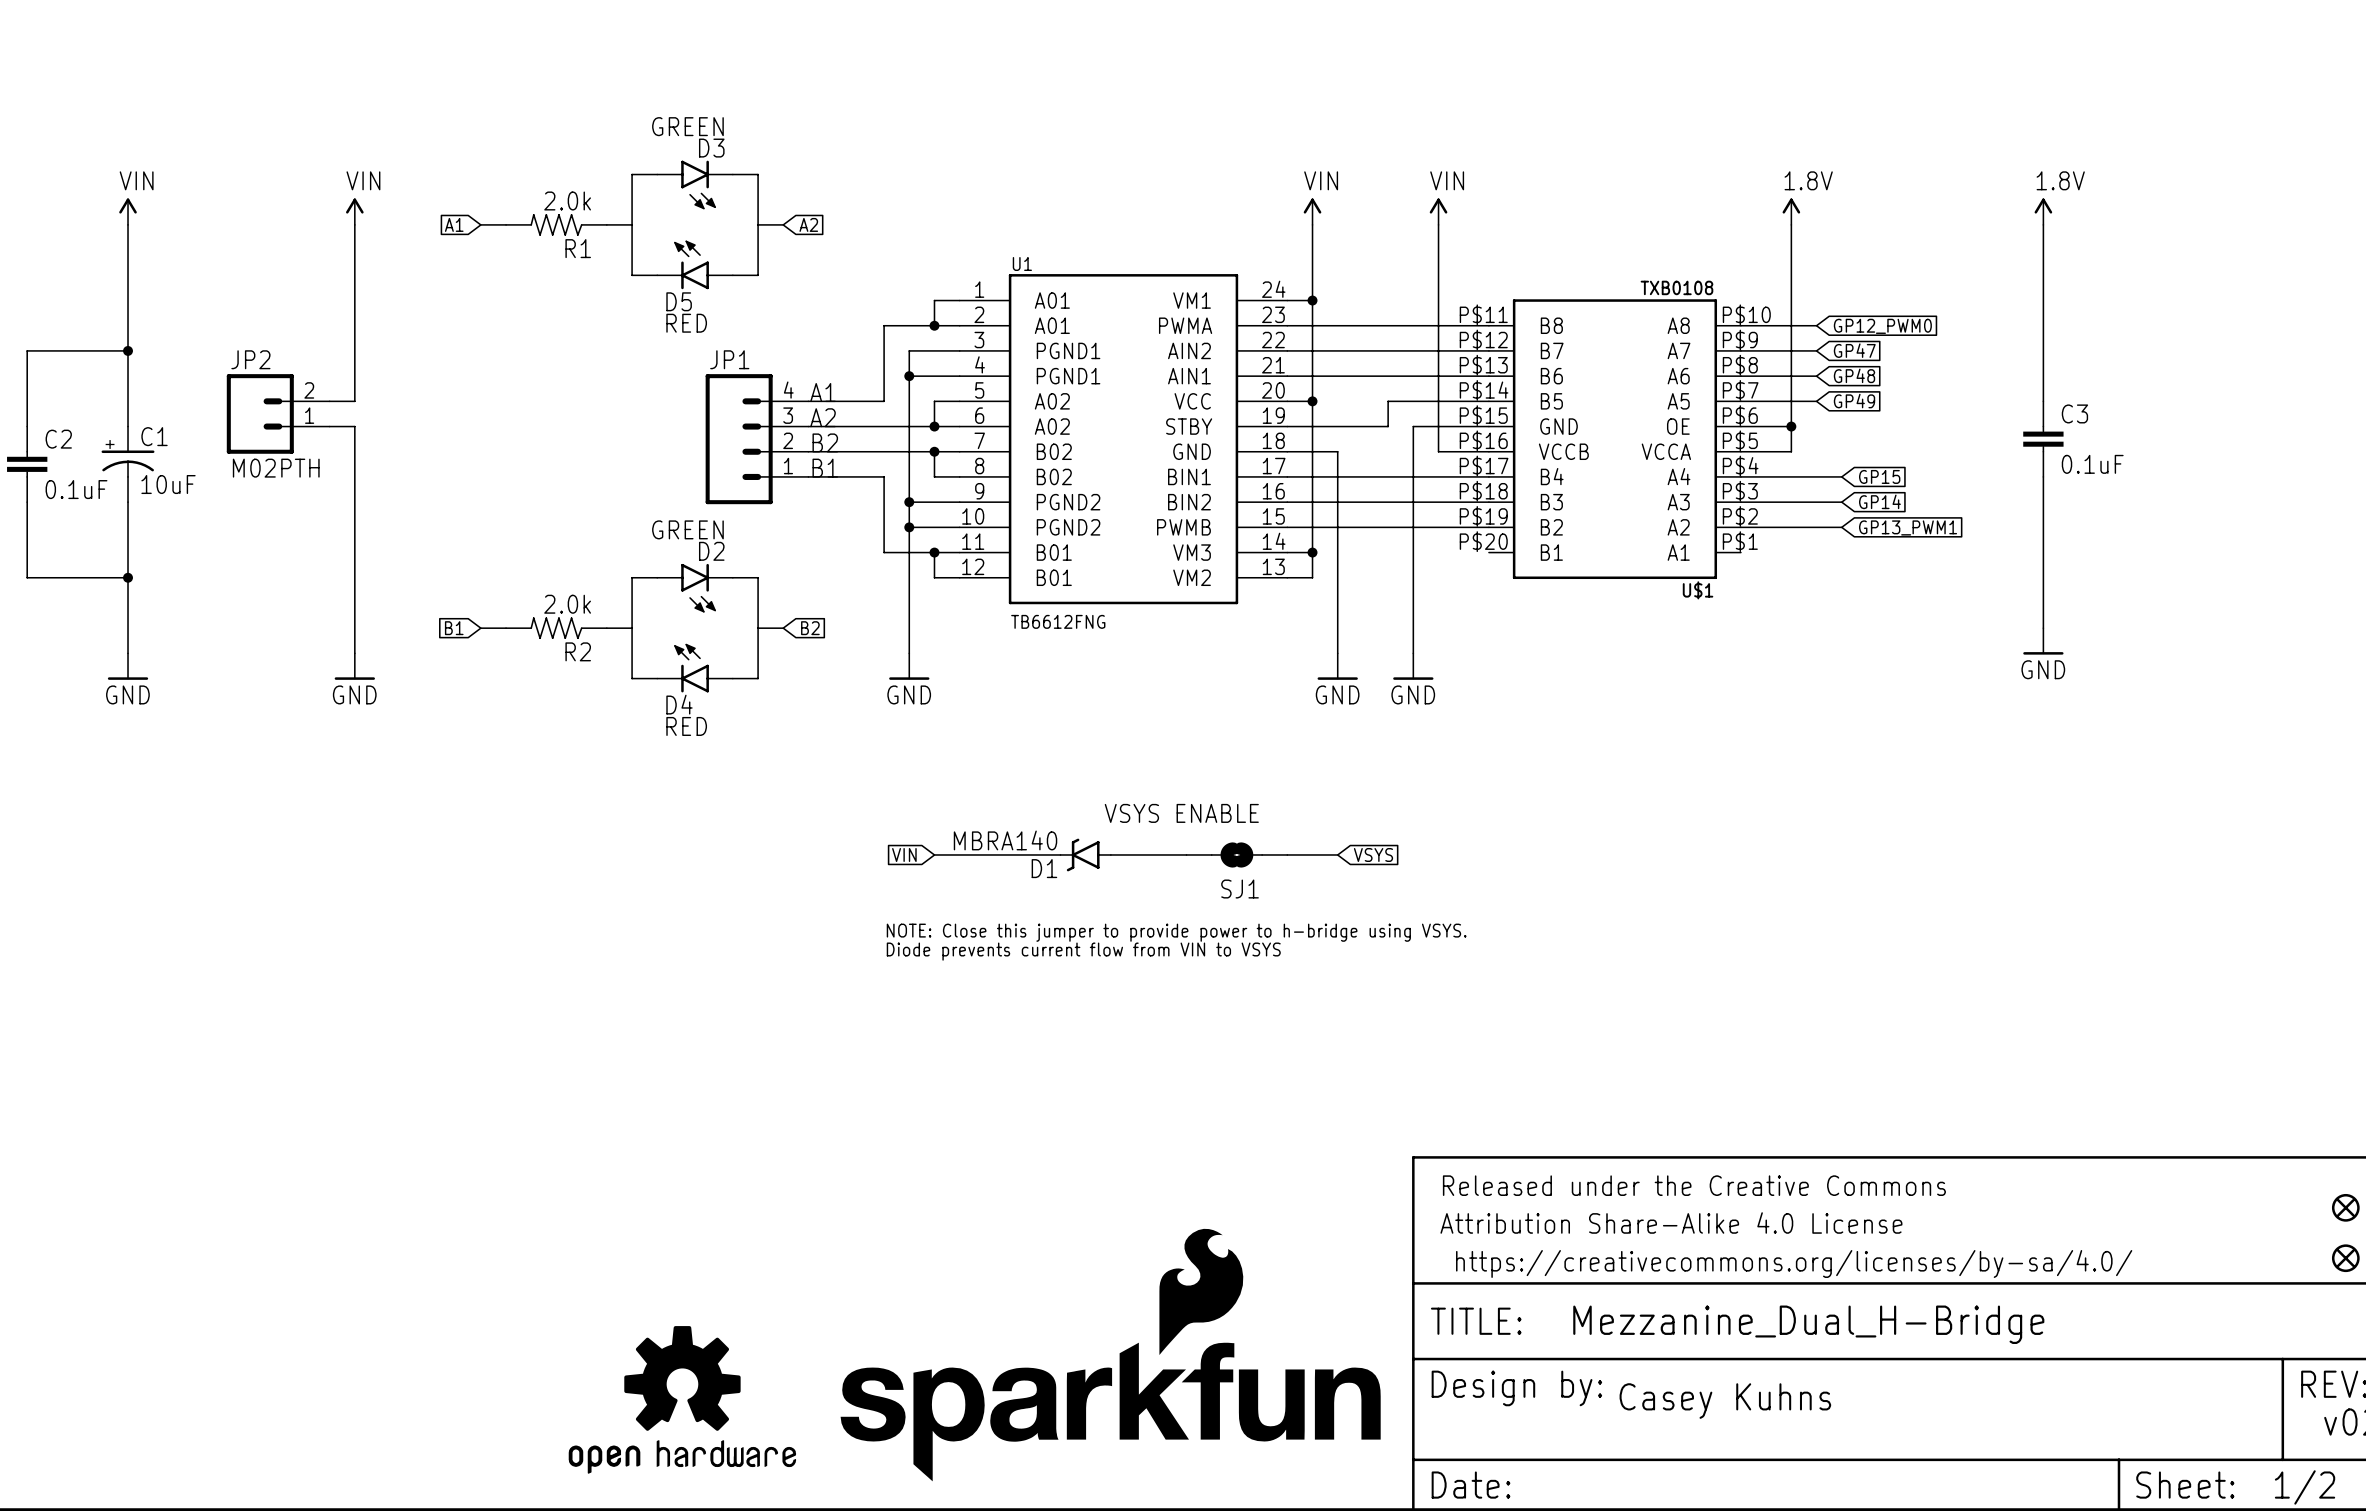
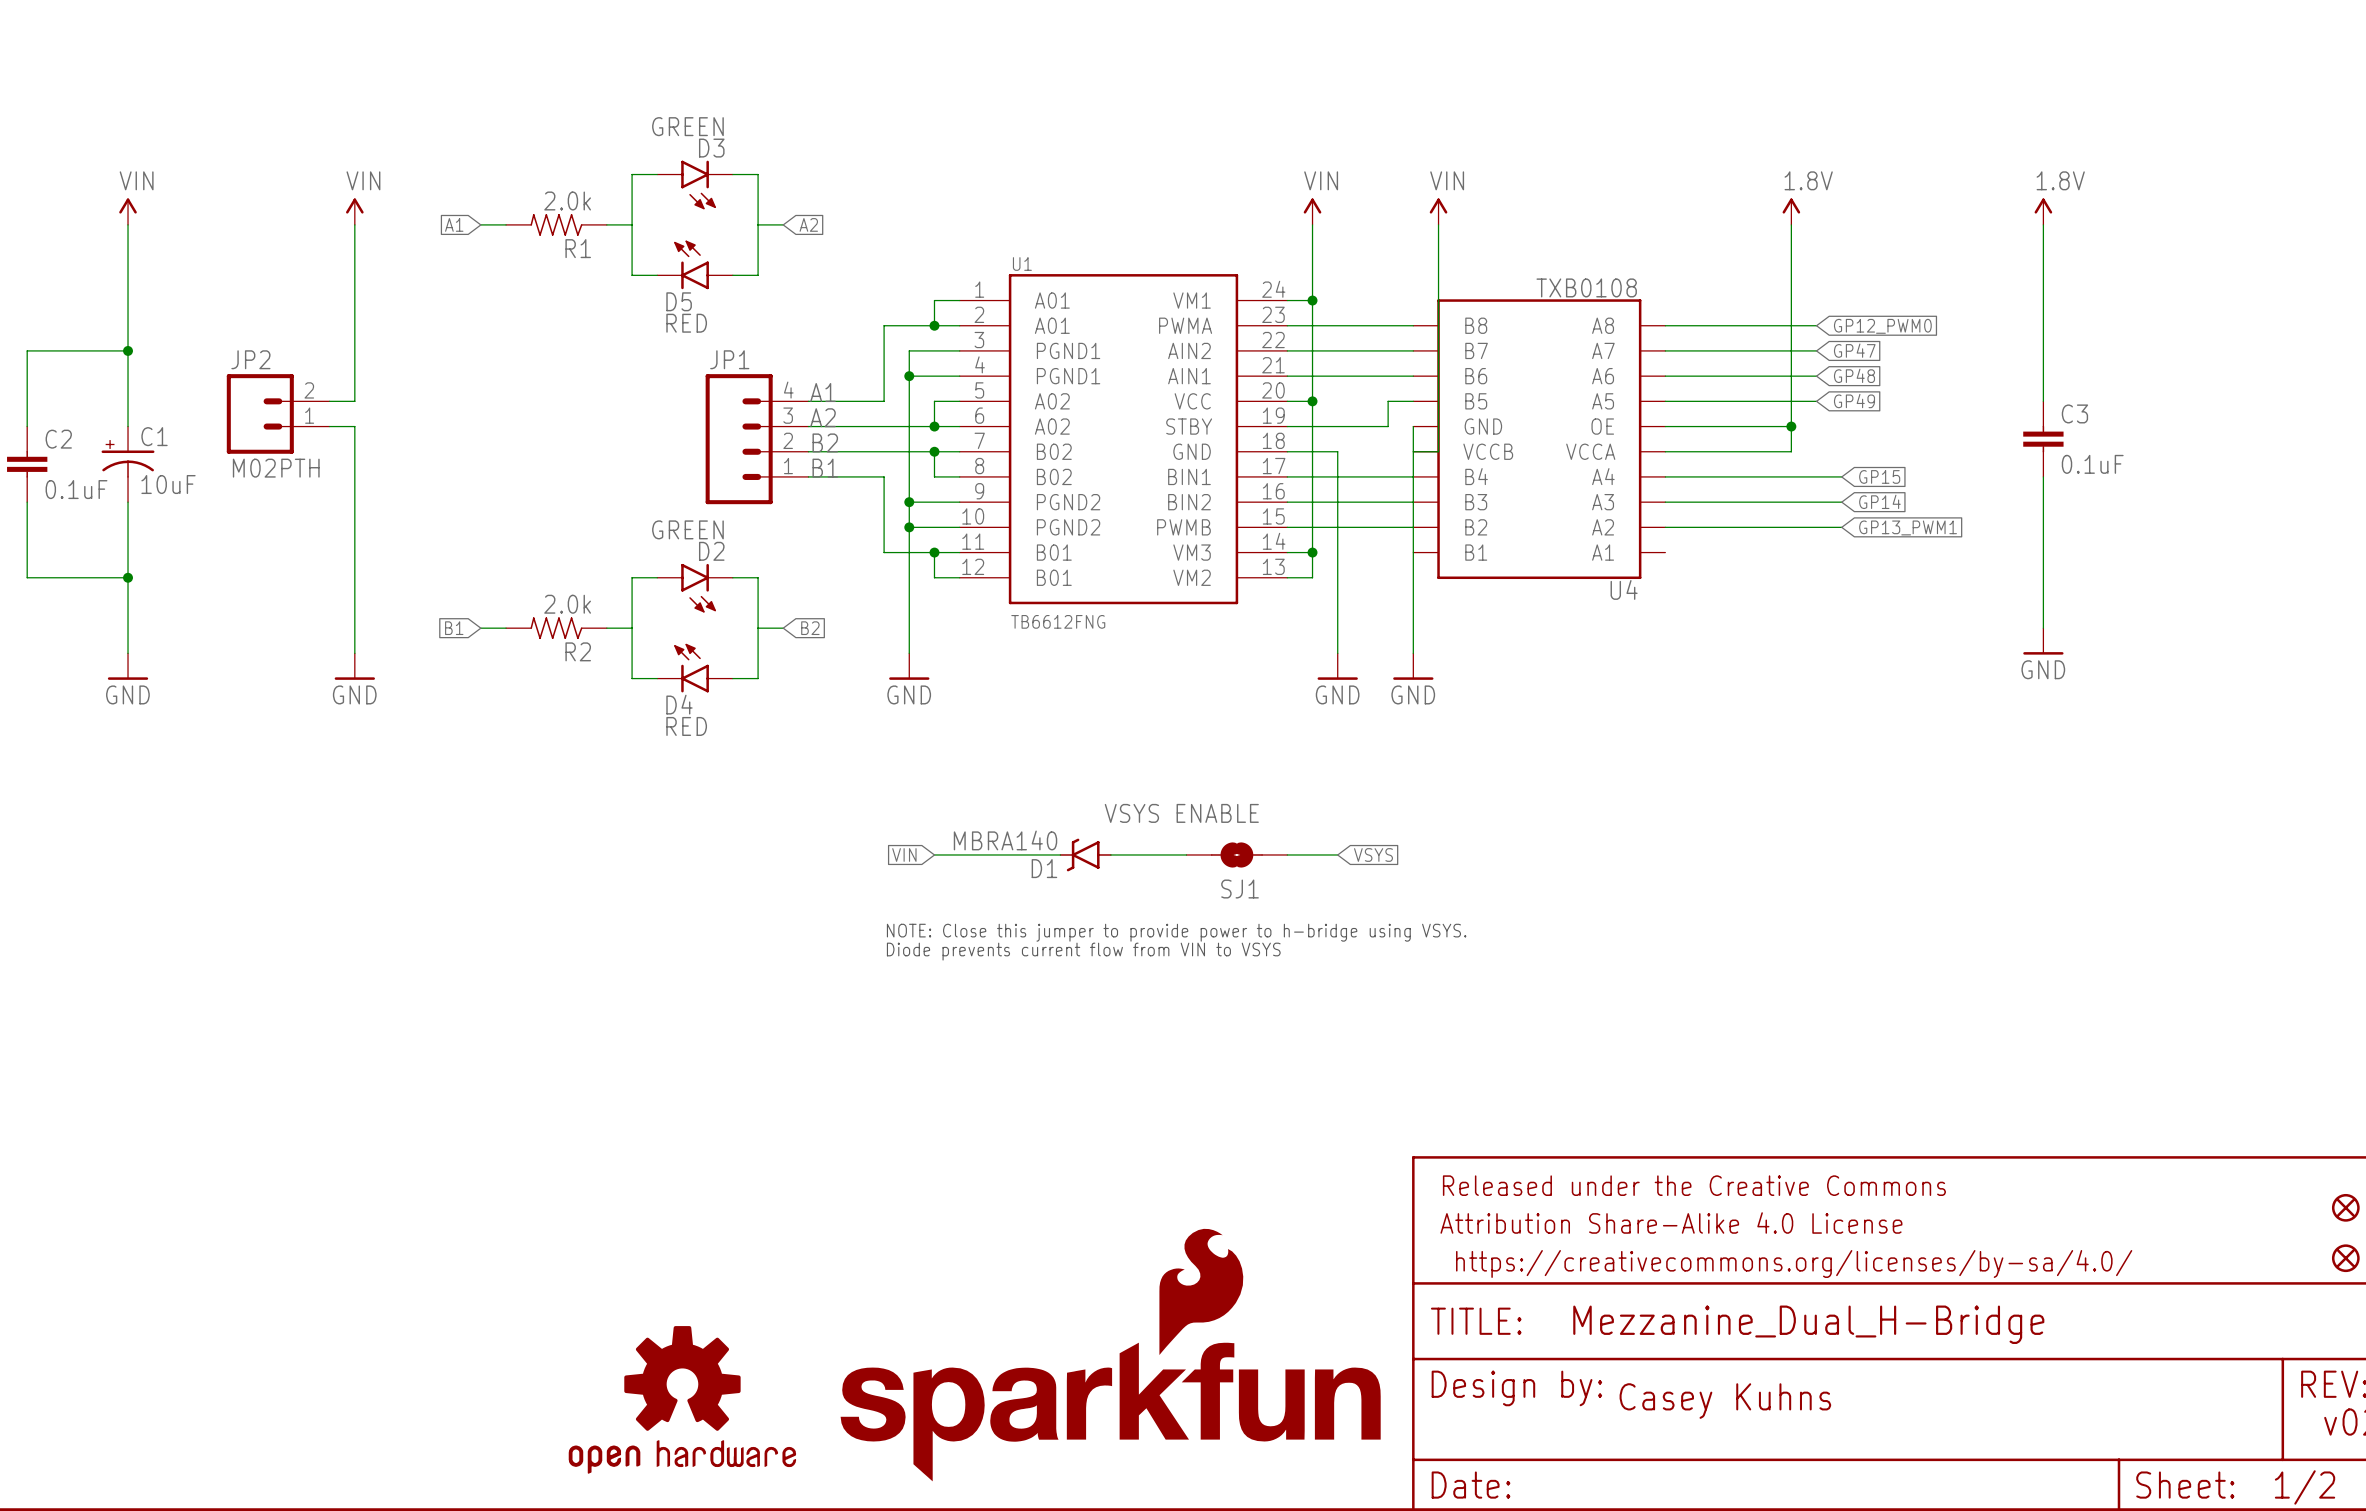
wire: (1413, 325) (1488, 325) -> none
wire: none -> (1665, 325) (1740, 325)
wire: (1413, 350) (1488, 350) -> none
wire: none -> (1665, 350) (1740, 350)
wire: (1413, 376) (1488, 376) -> none
wire: none -> (1665, 376) (1740, 376)
wire: (1413, 401) (1488, 401) -> none
wire: none -> (1665, 401) (1740, 401)
wire: (1413, 426) (1488, 426) -> none
wire: none -> (1665, 426) (1740, 426)
U4: none -> TXB0108 (1539, 439)
U$1: TXB0108 (1614, 439) -> none
wire: (1438, 451) (1488, 451) -> (1438, 451) (1413, 451)
wire: none -> (1665, 451) (1740, 451)
wire: (1413, 476) (1488, 476) -> none
wire: none -> (1665, 476) (1740, 476)
wire: (1413, 502) (1488, 502) -> none
wire: none -> (1665, 502) (1740, 502)
wire: (1413, 527) (1488, 527) -> none
wire: none -> (1665, 527) (1740, 527)

